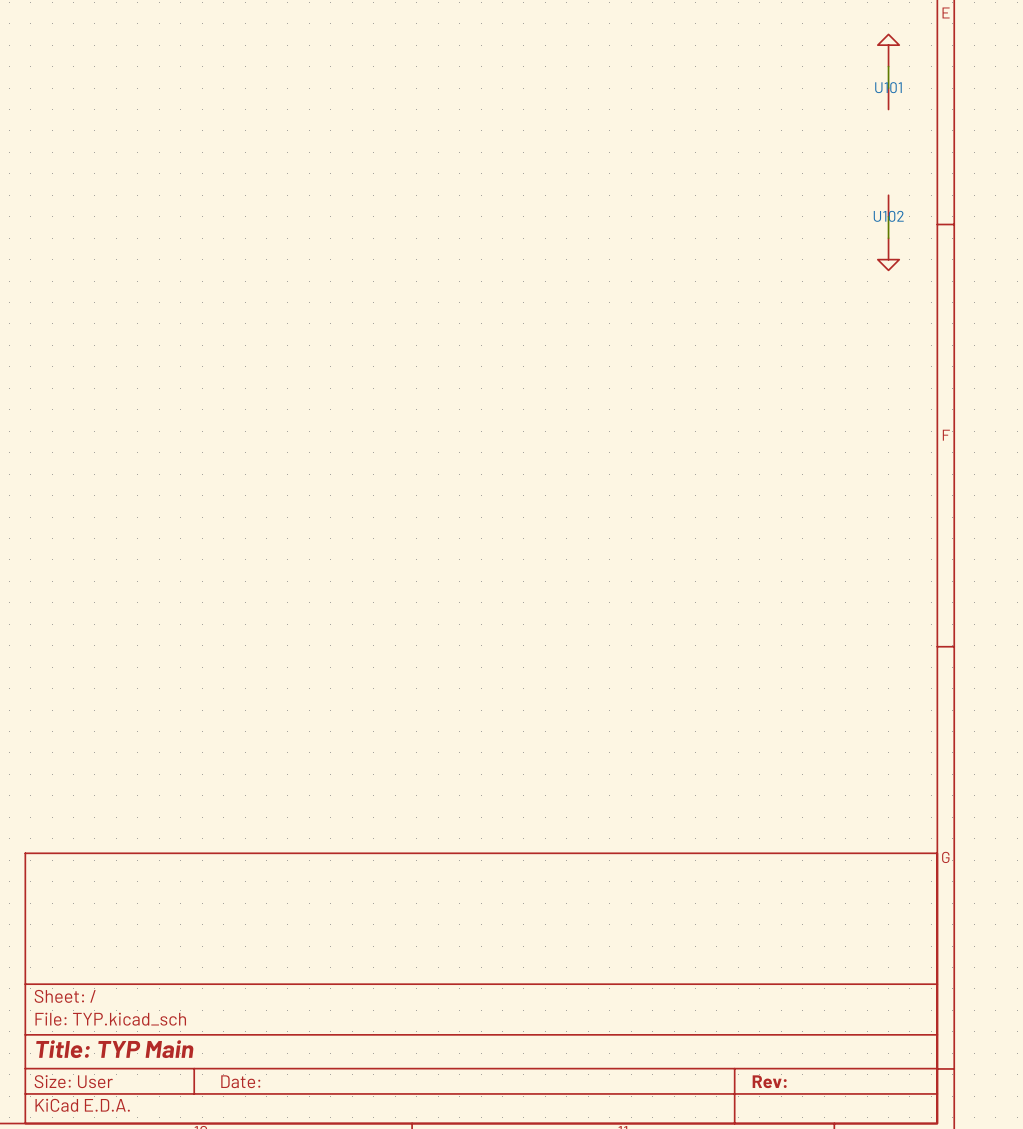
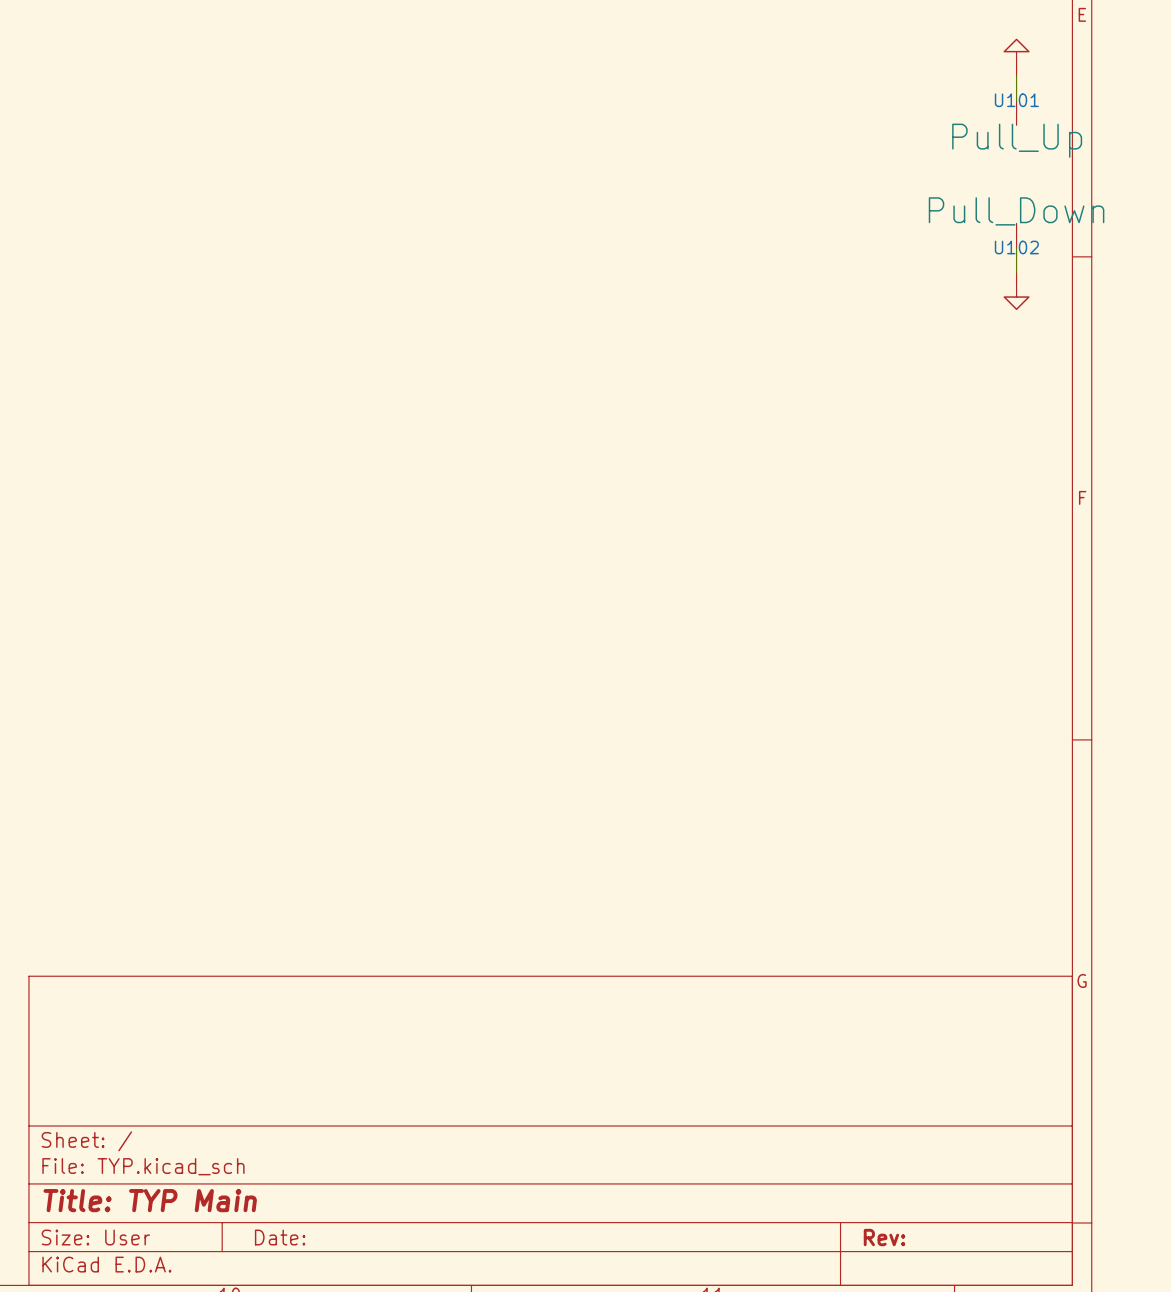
U101 value: none -> Pull_Up (1017, 140)
U102 value: none -> Pull_Down (1016, 211)

